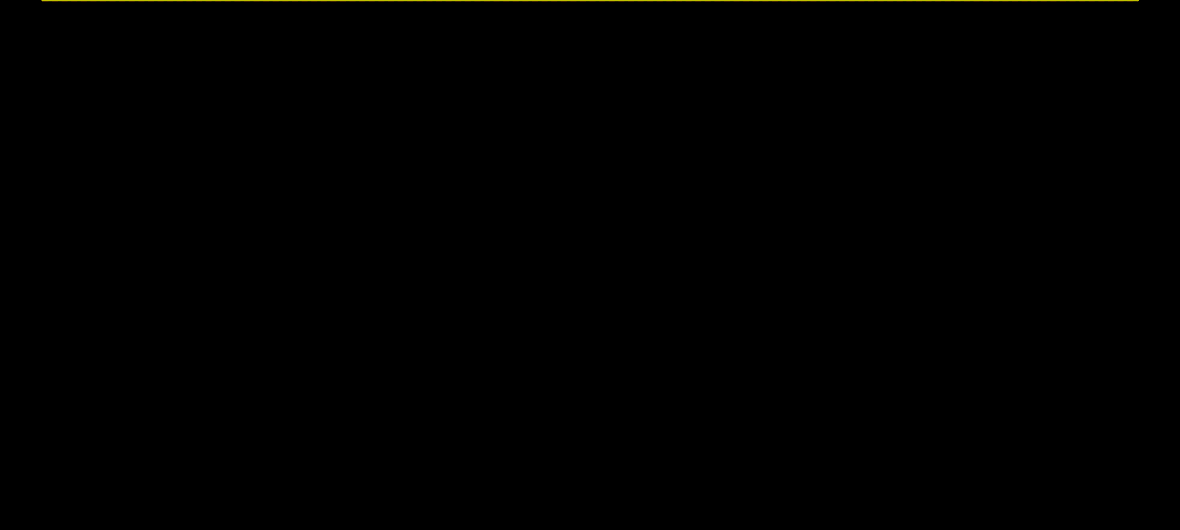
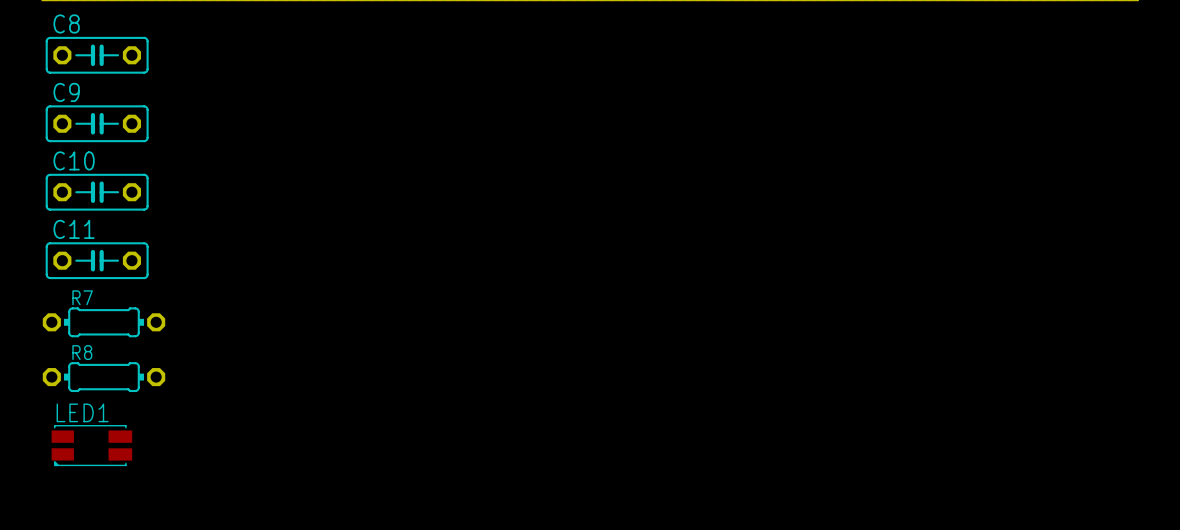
C8: none -> (97, 55)
C9: none -> (97, 123)
C10: none -> (97, 192)
C11: none -> (97, 260)
R7: none -> (104, 322)
R8: none -> (104, 377)
LED1: none -> (91, 445)

